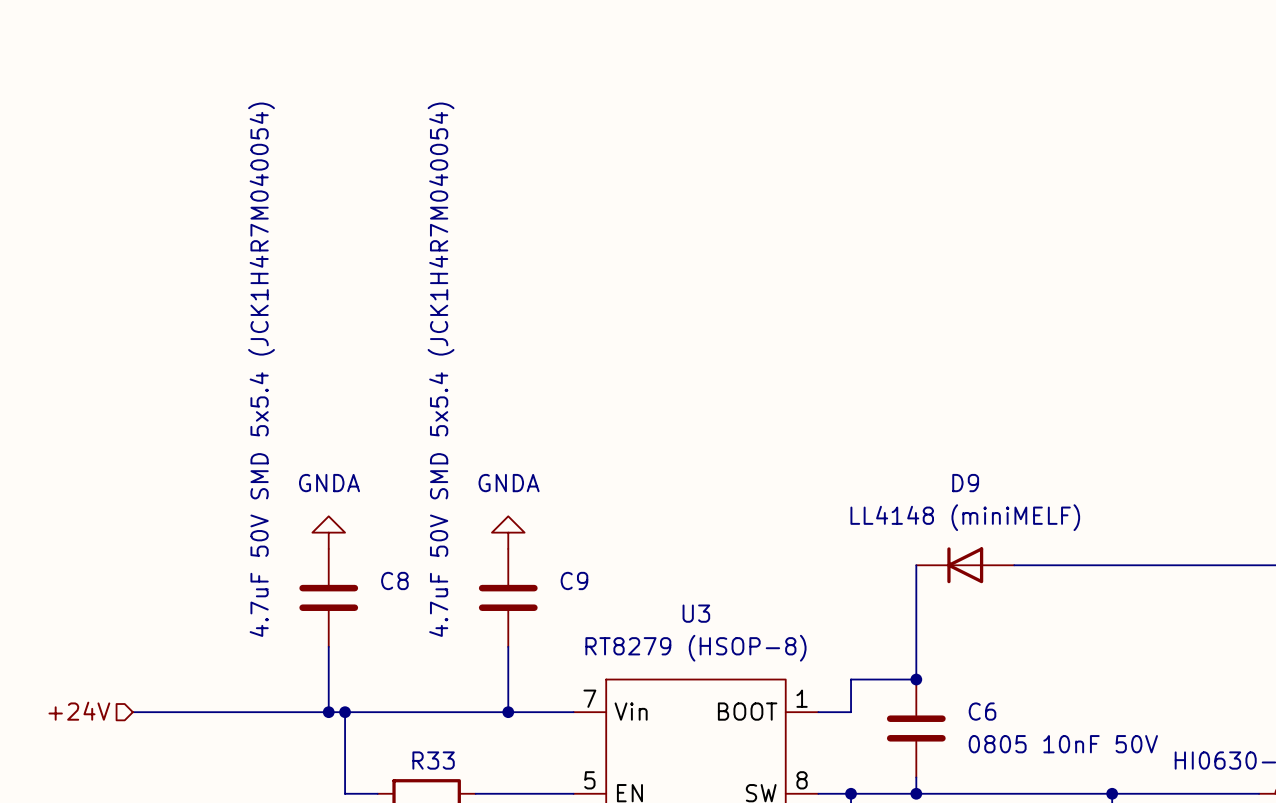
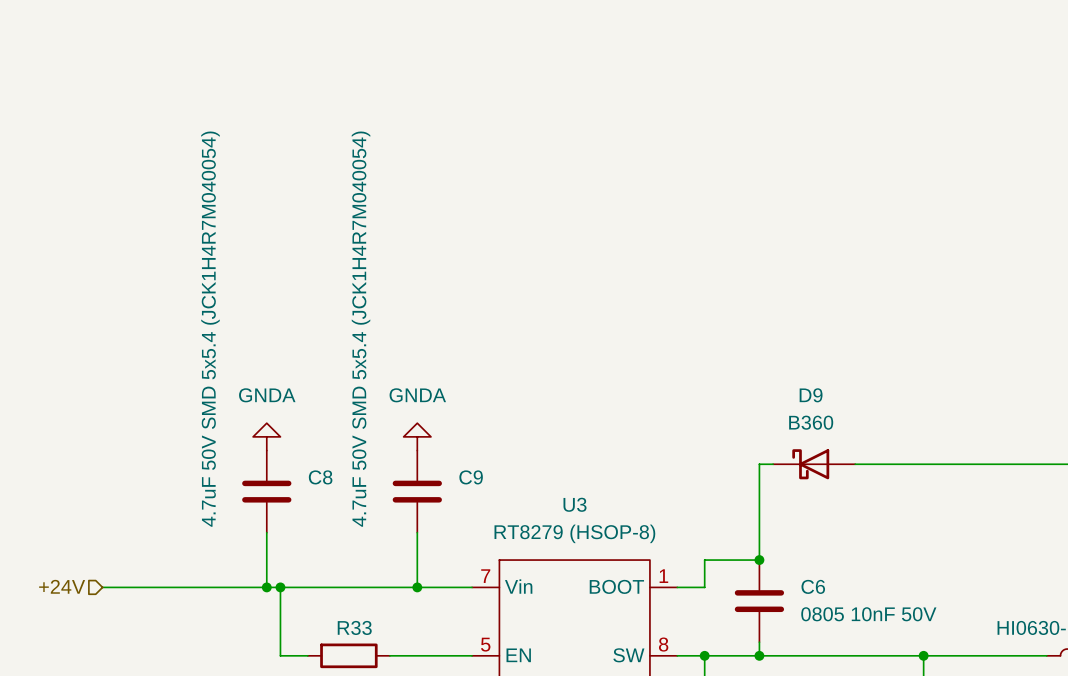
D9 value: LL4148 (miniMELF) (965, 517) -> B360 (811, 422)
D9 symbol: [916, 547, 1015, 584] -> [773, 449, 856, 480]

